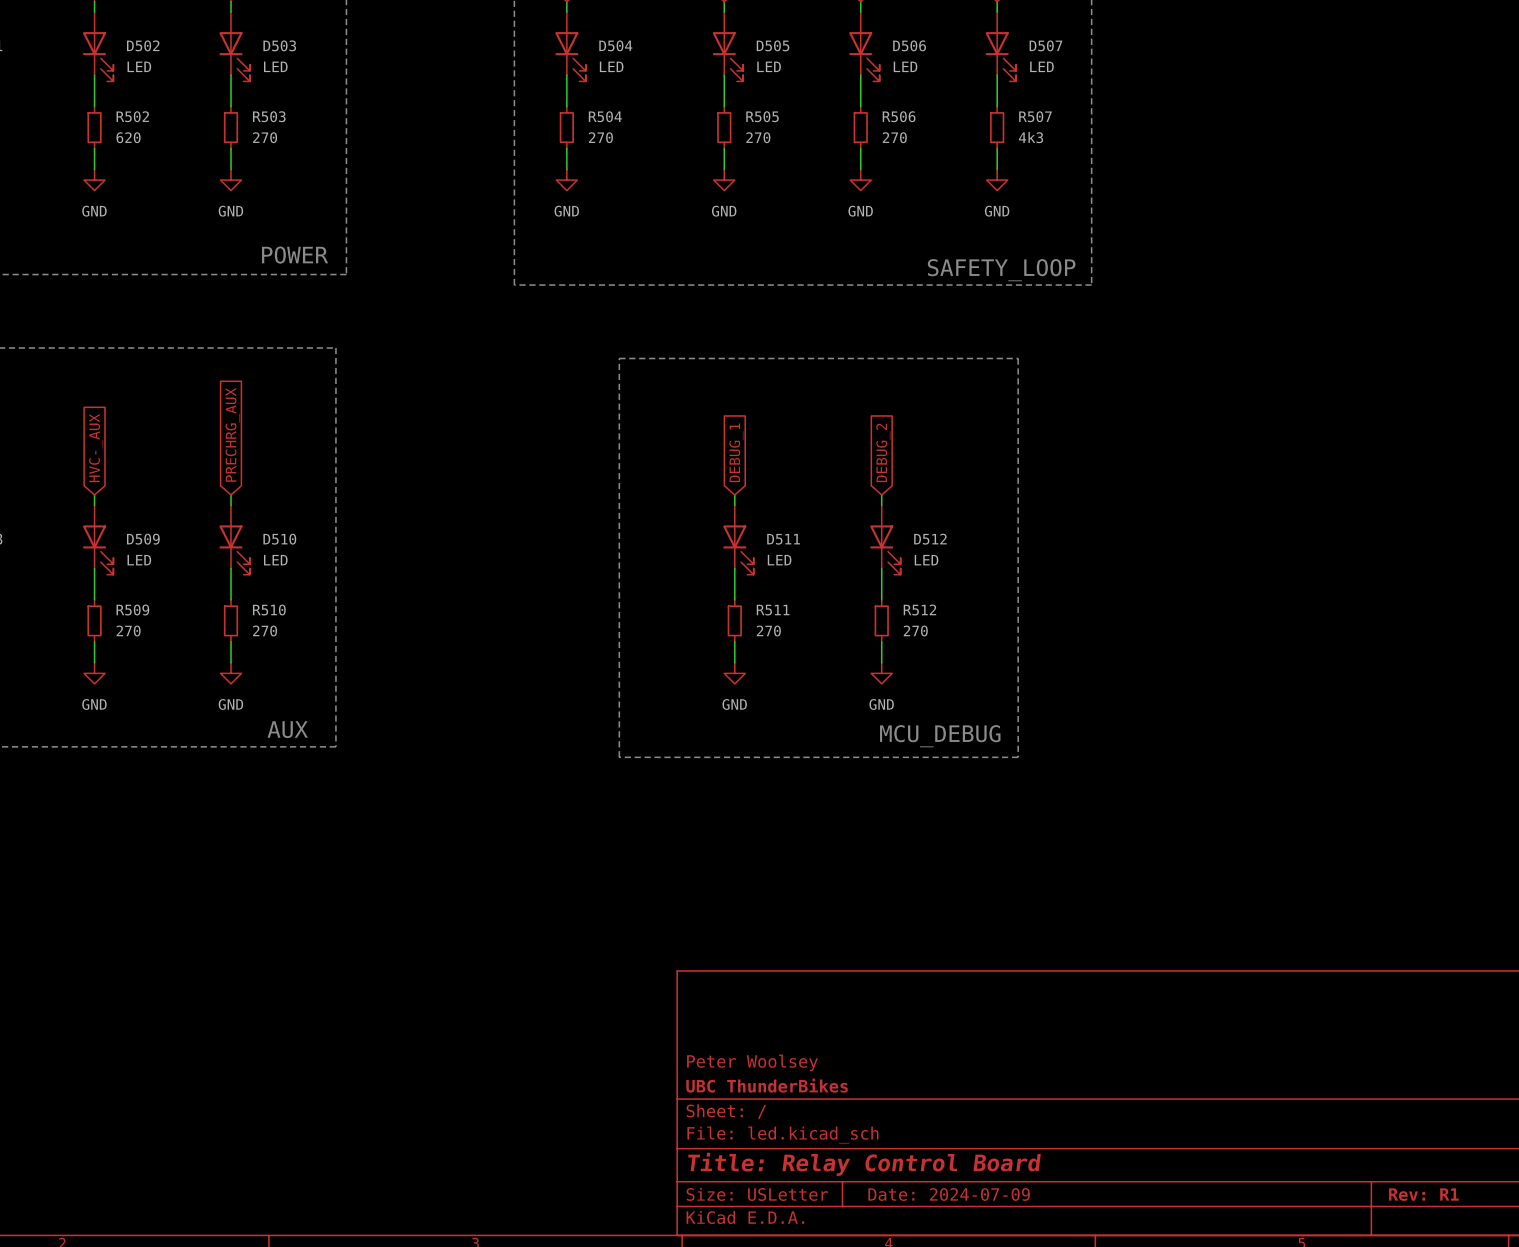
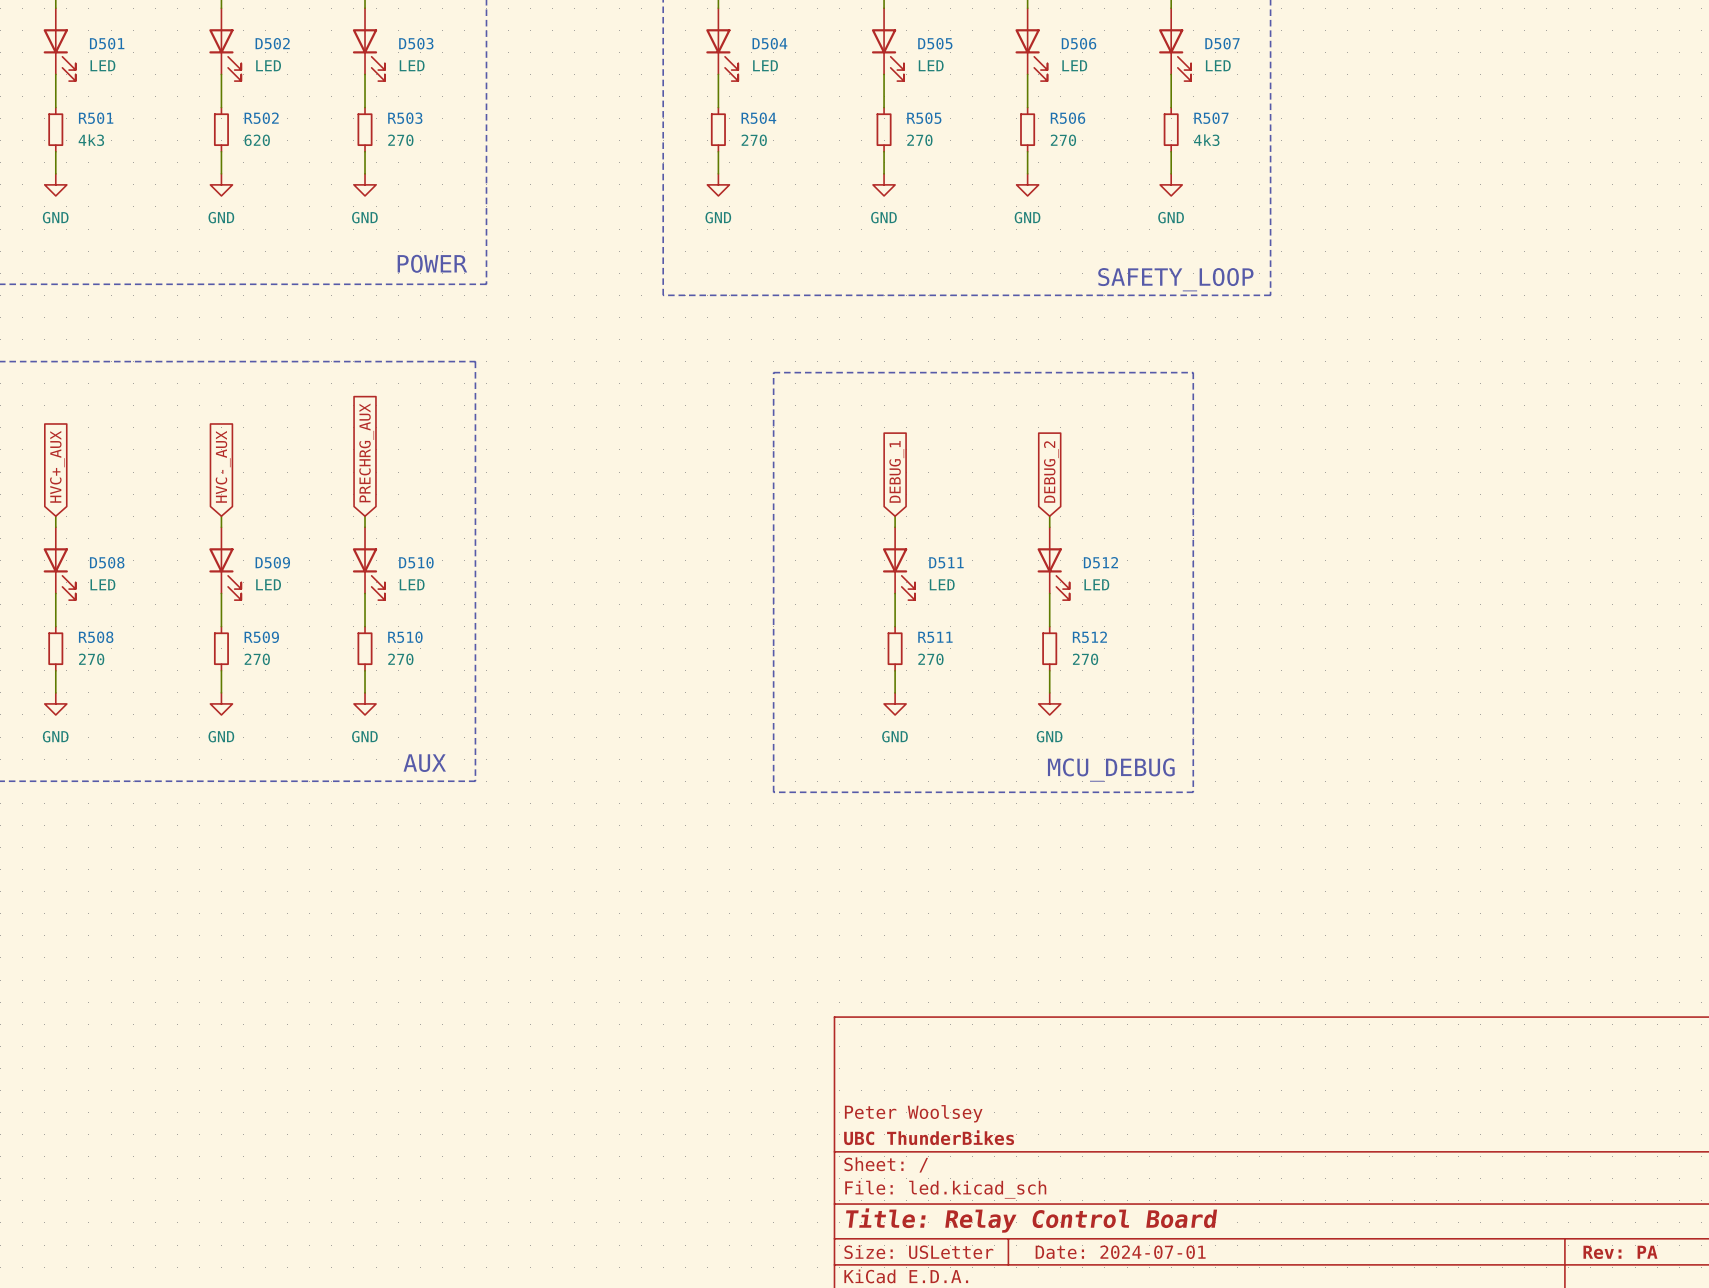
title block: Date: 2024-07-09 (949, 1194) -> Date: 2024-07-01 (1120, 1252)
title block: Rev: R1 (1423, 1194) -> Rev: PA (1620, 1252)

